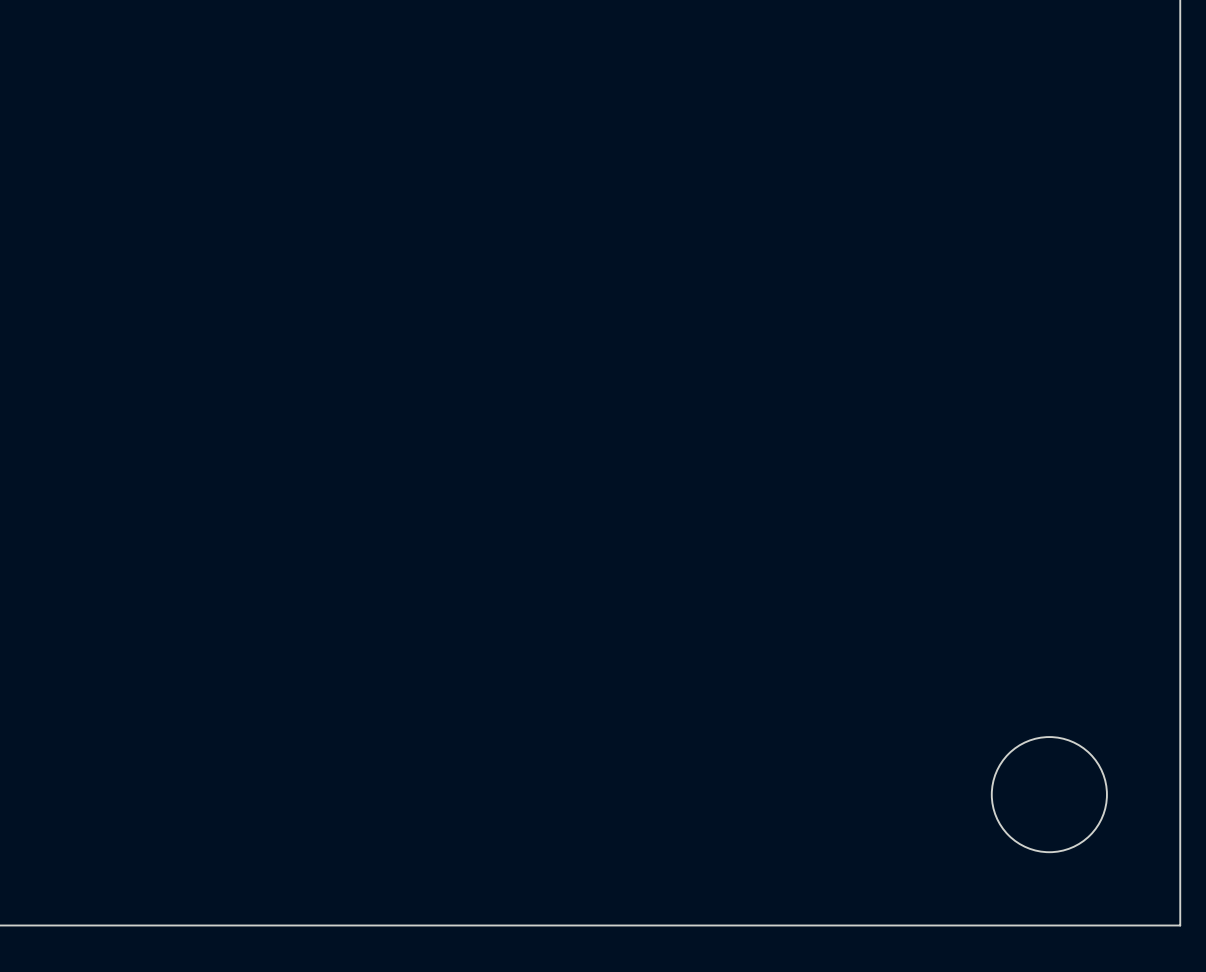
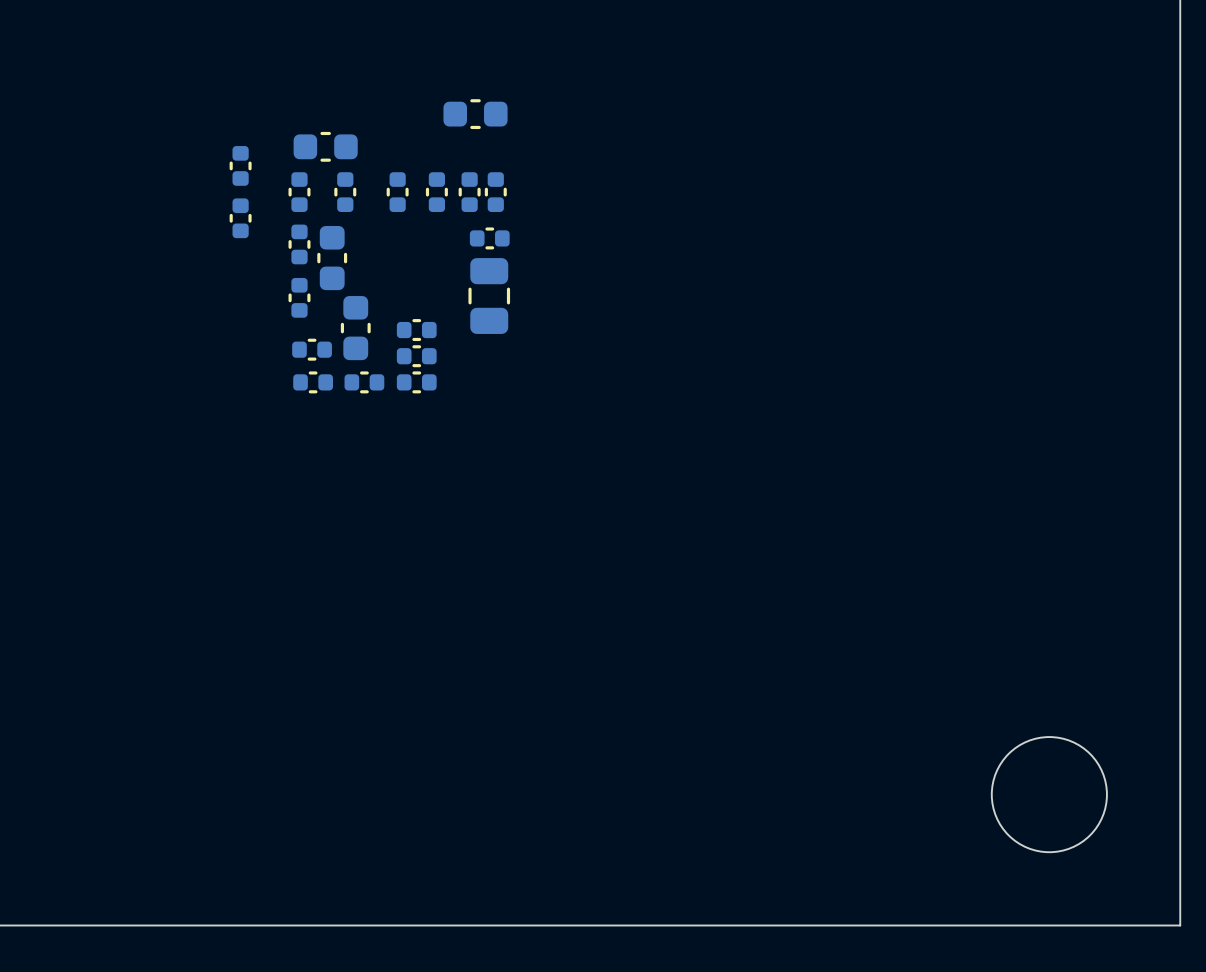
part: none -> (475, 114)
part: none -> (325, 146)
part: none -> (240, 165)
part: none -> (299, 192)
part: none -> (345, 192)
part: none -> (397, 192)
part: none -> (436, 192)
part: none -> (469, 192)
part: none -> (495, 192)
part: none -> (240, 218)
part: none -> (489, 238)
part: none -> (299, 244)
part: none -> (332, 258)
part: none -> (489, 296)
part: none -> (299, 297)
part: none -> (355, 328)
part: none -> (416, 330)
part: none -> (312, 349)
part: none -> (416, 356)
part: none -> (313, 382)
part: none -> (364, 382)
part: none -> (416, 382)

